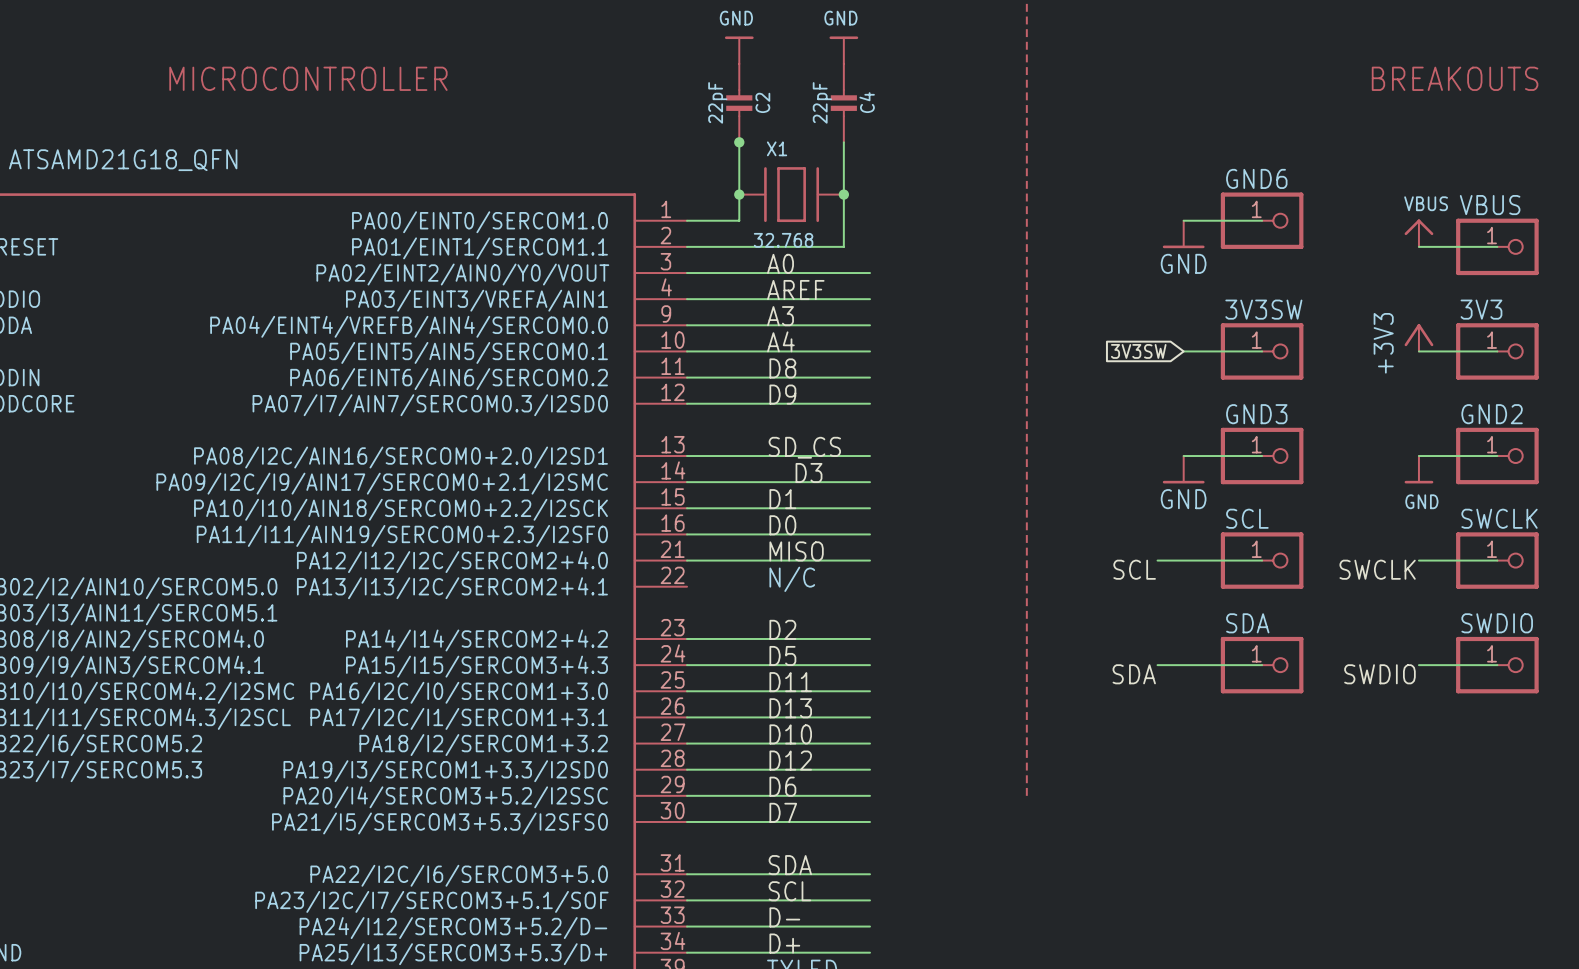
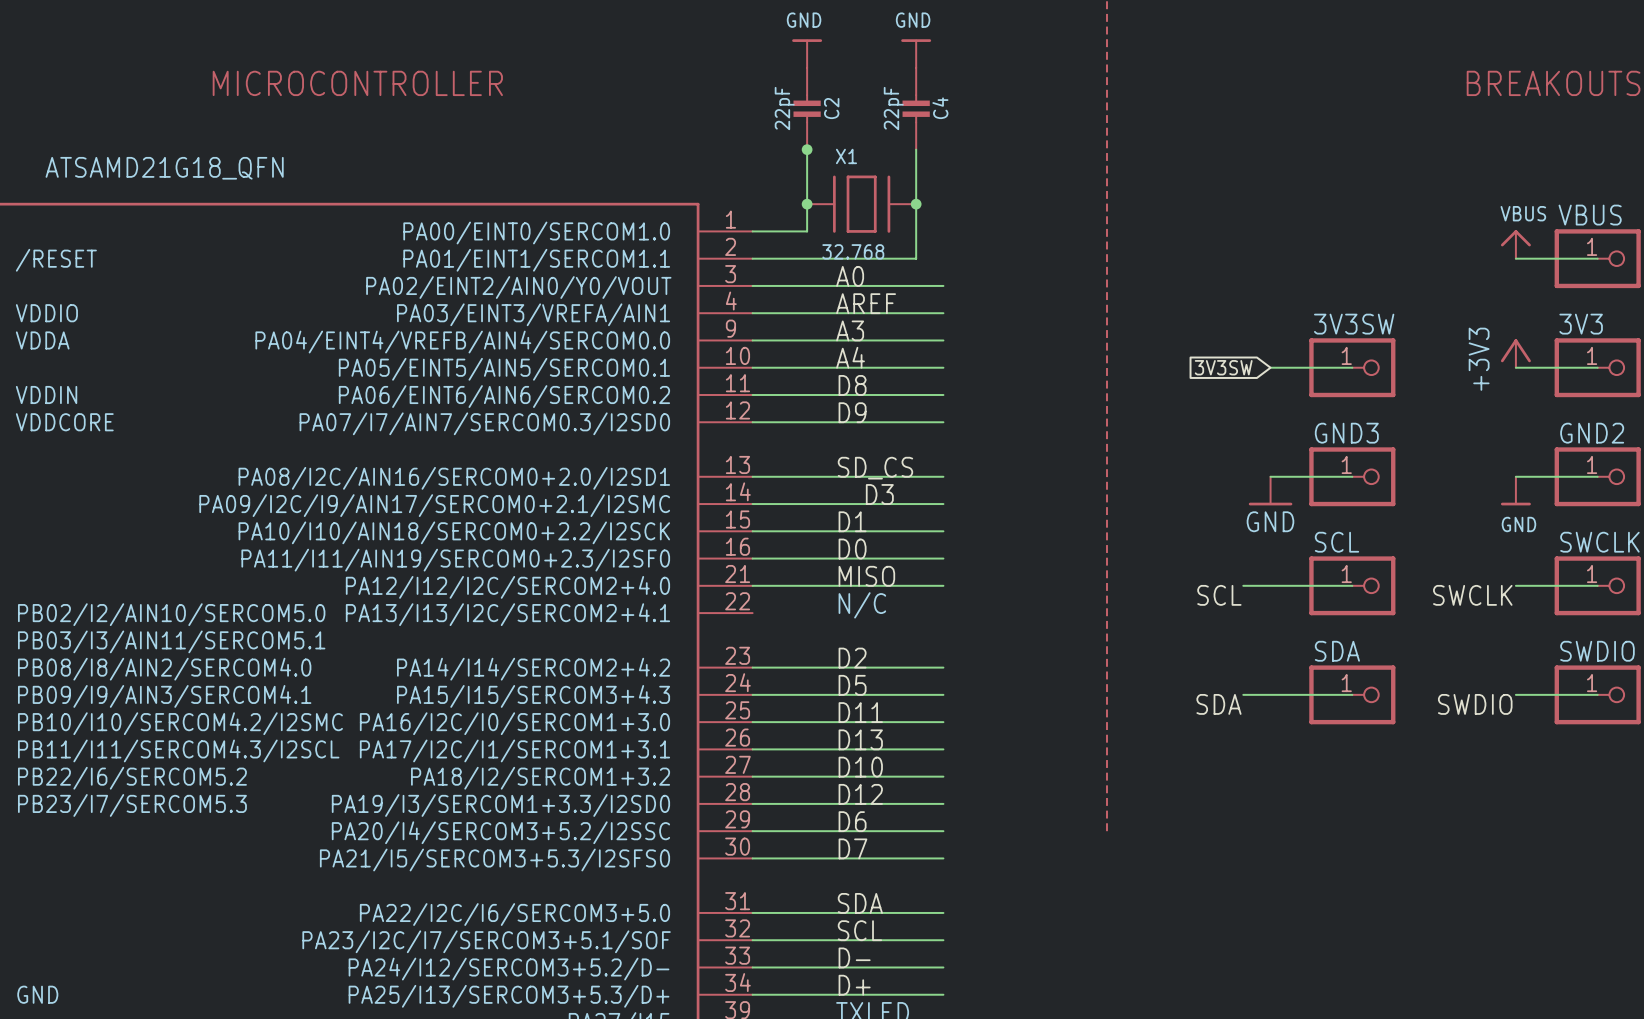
wire: (1183, 220) (1262, 220) -> none
GND6: (1262, 220) -> none
power symbol: GND (1183, 234) -> none

